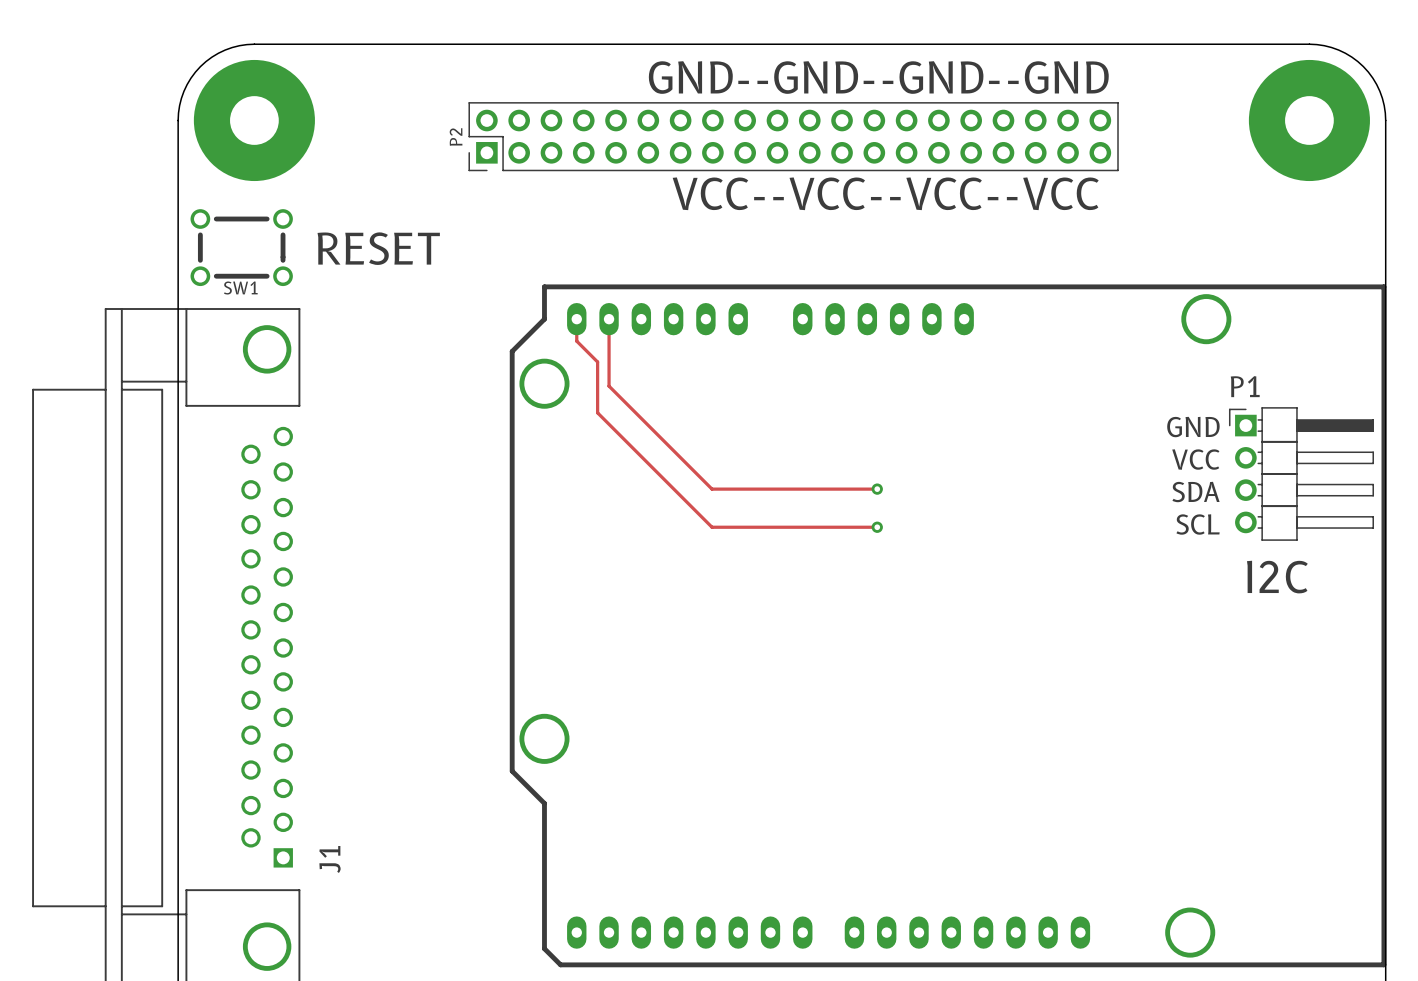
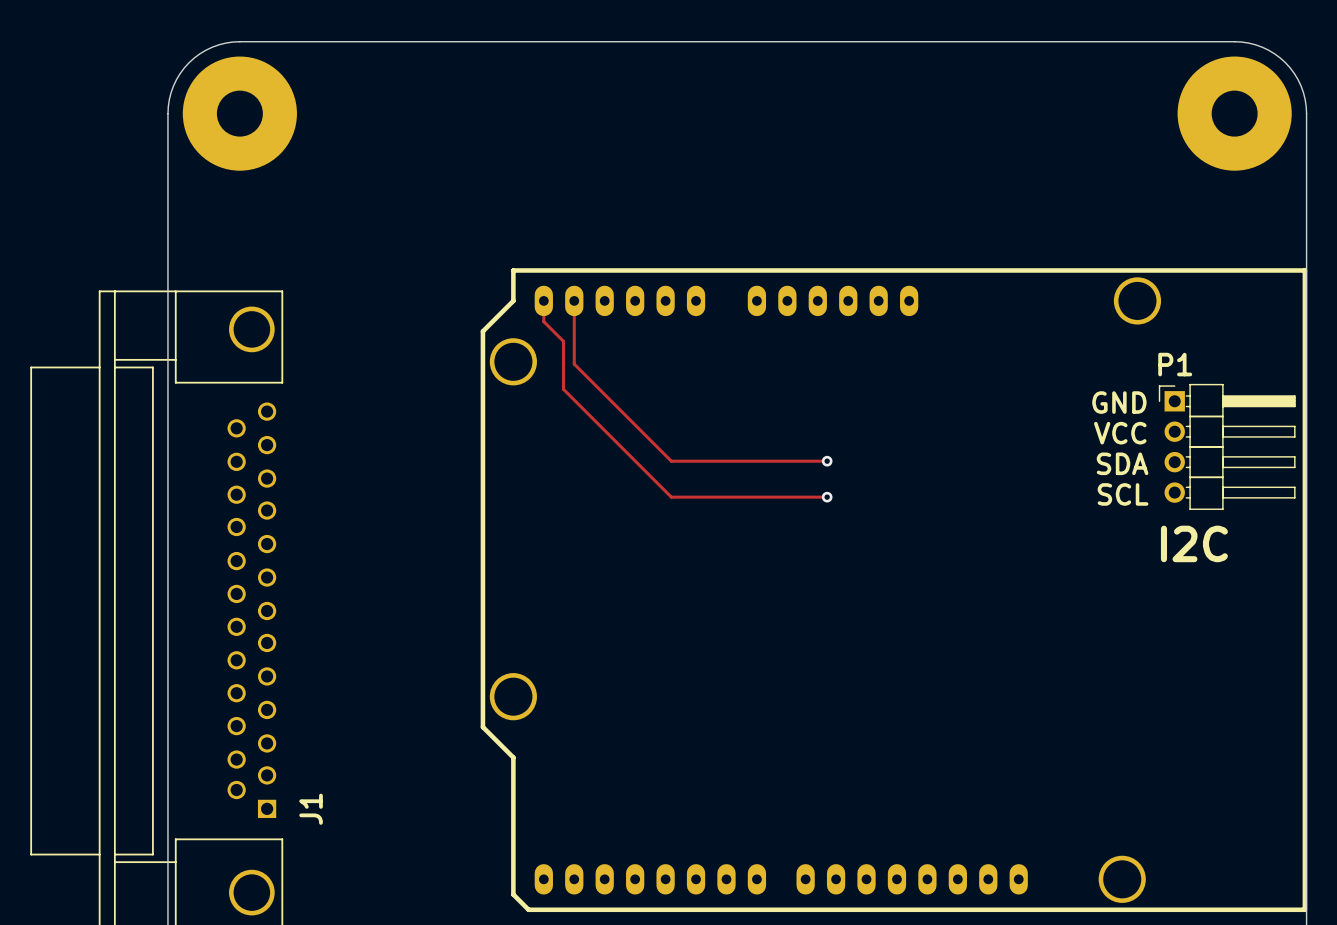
text: GND--GND--GND--GND (878, 77) -> none
P2: (793, 136) -> none
text: VCC--VCC--VCC--VCC (885, 193) -> none
SW1: (241, 247) -> none
text: RESET (378, 248) -> none

